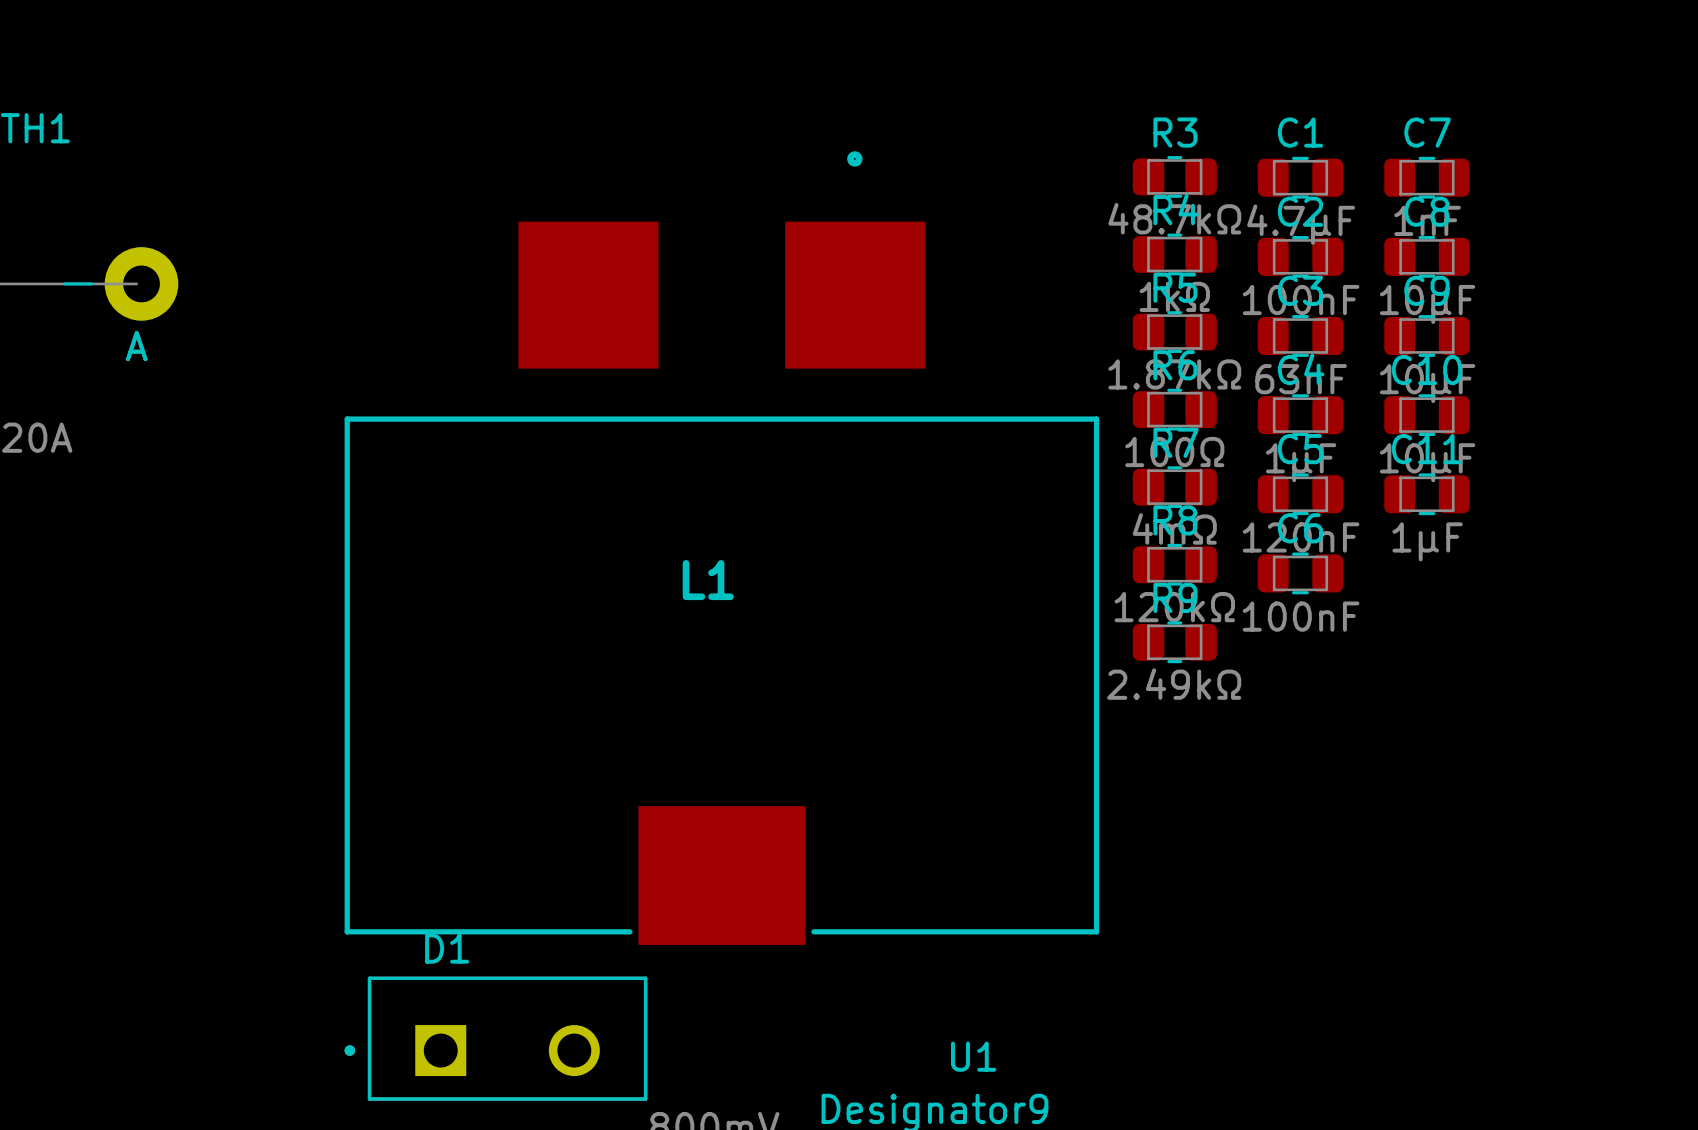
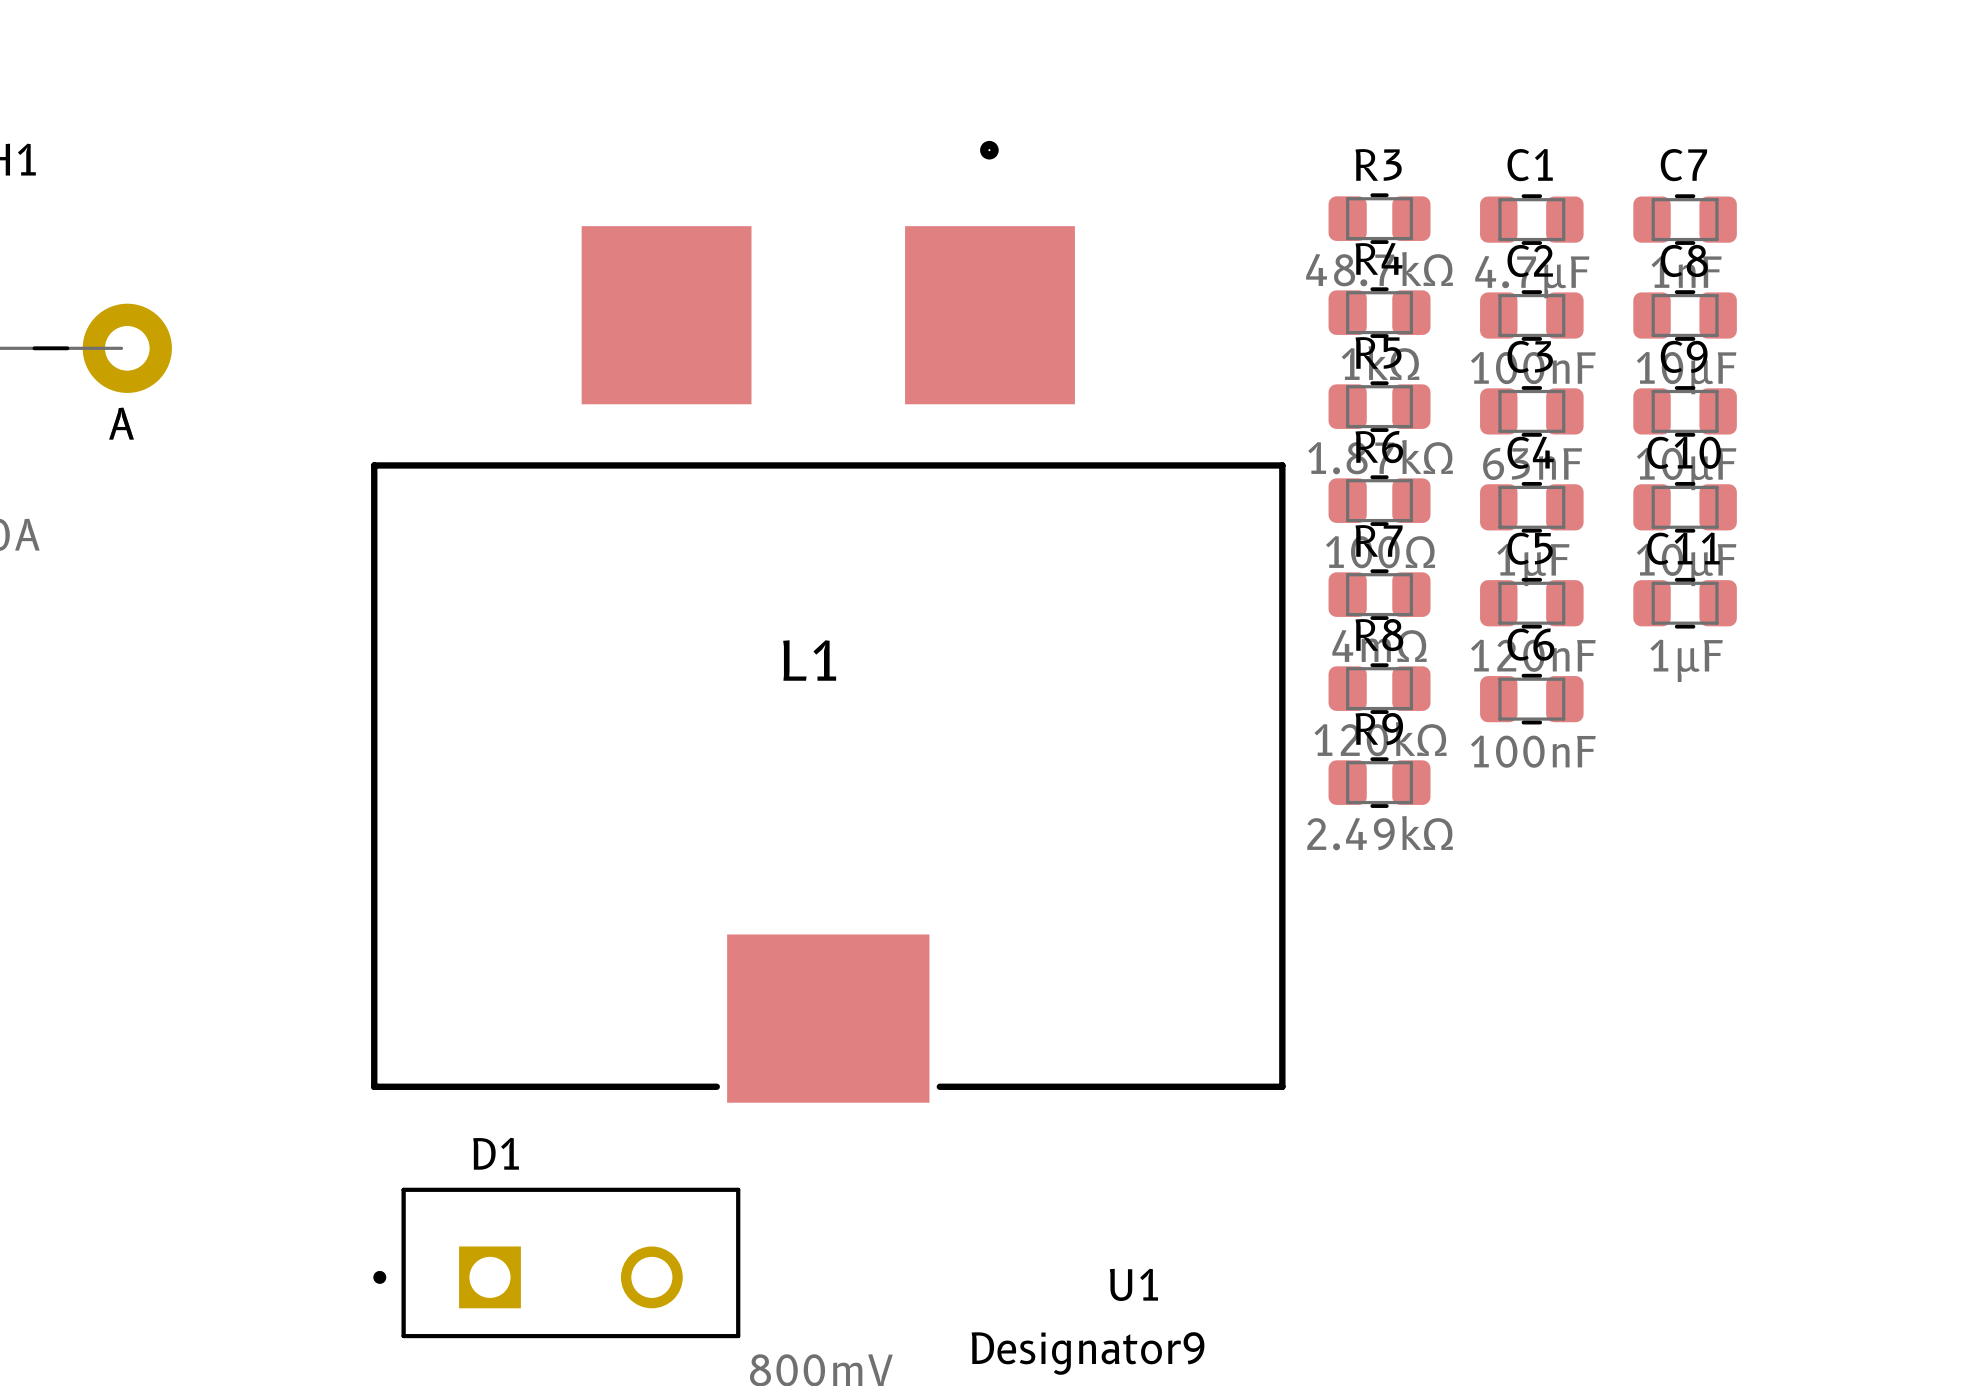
L1 position: (721, 548) -> (828, 621)

